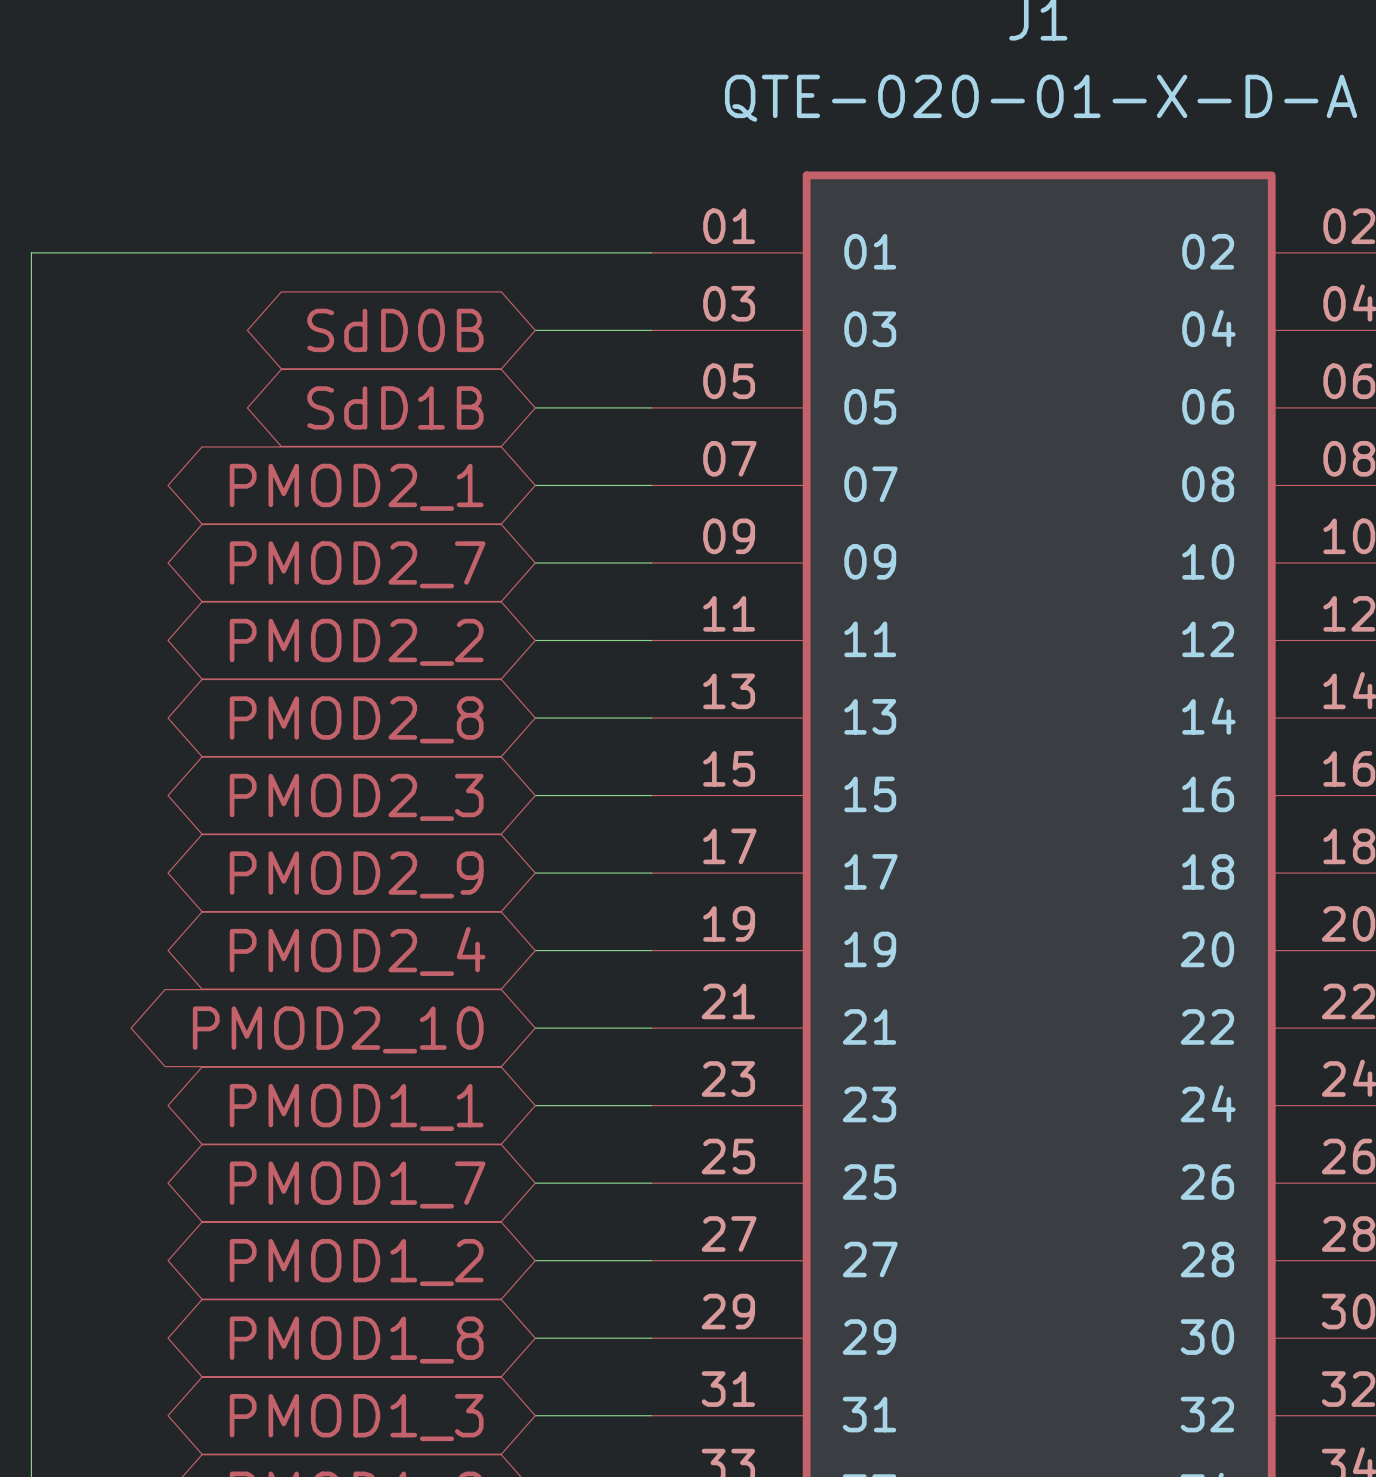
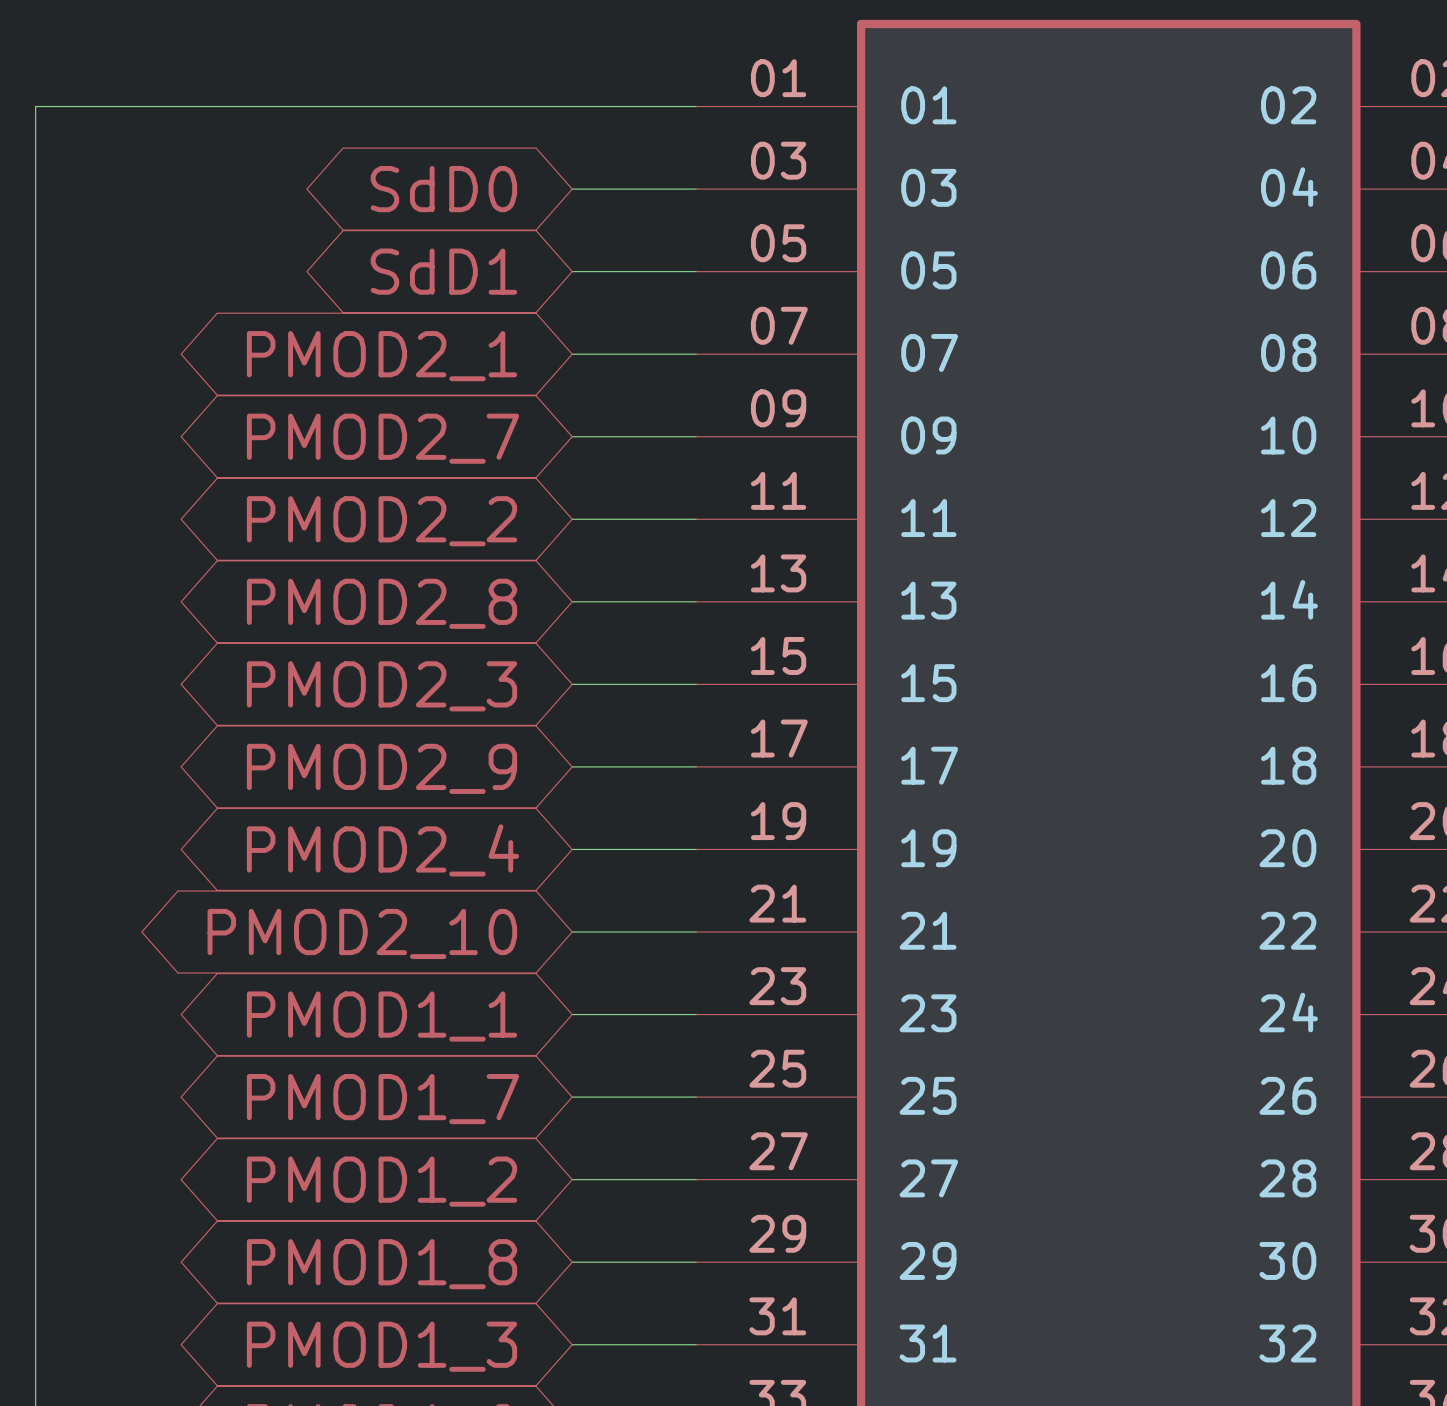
global label: SdD0B (395, 330) -> SdD0 (443, 189)
global label: SdD1B (395, 407) -> SdD1 (443, 271)

